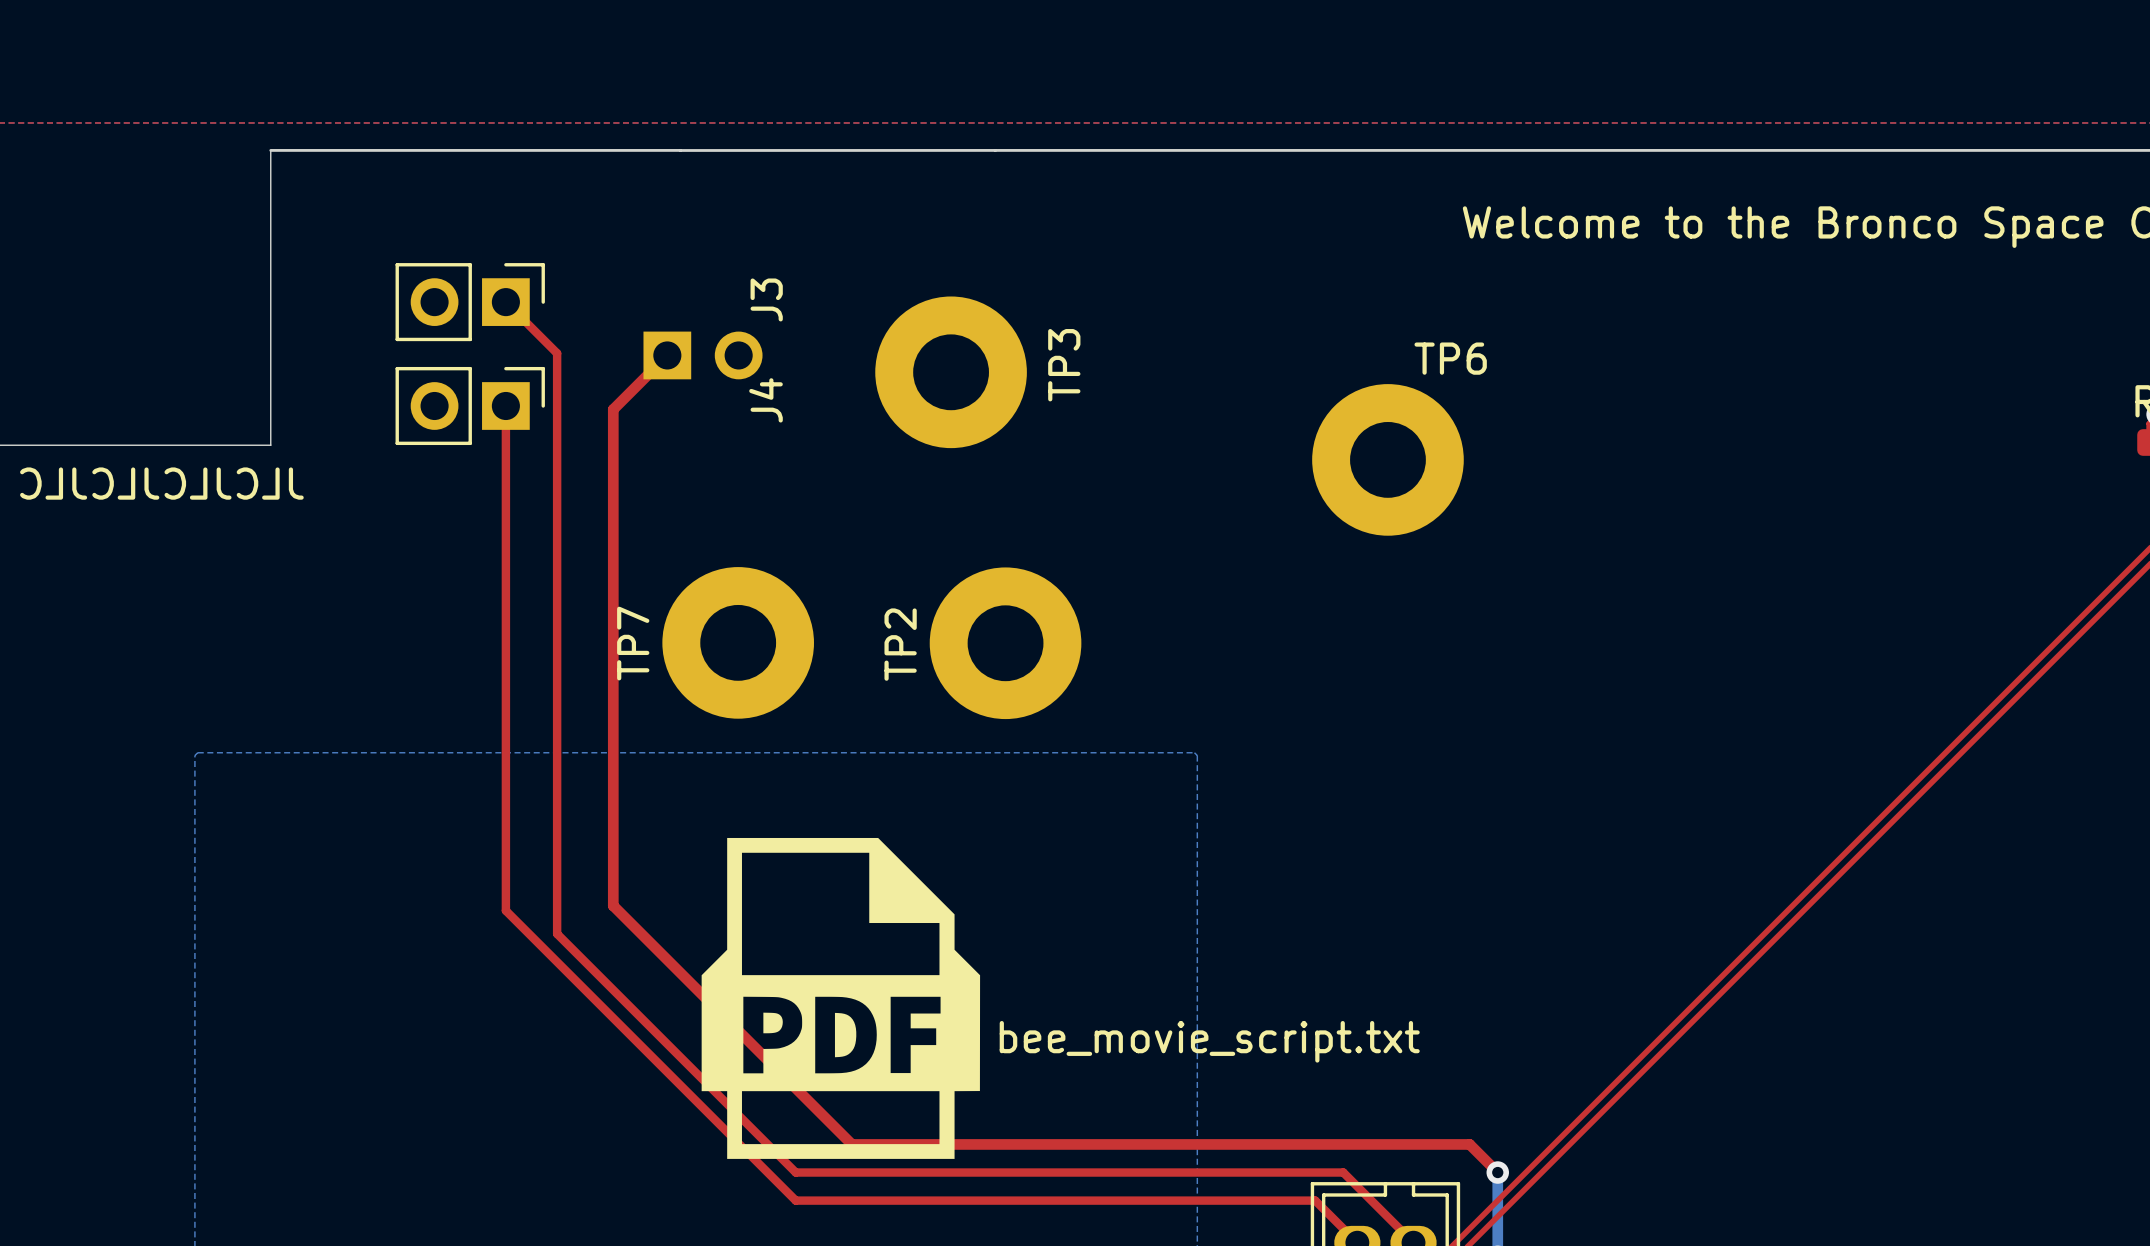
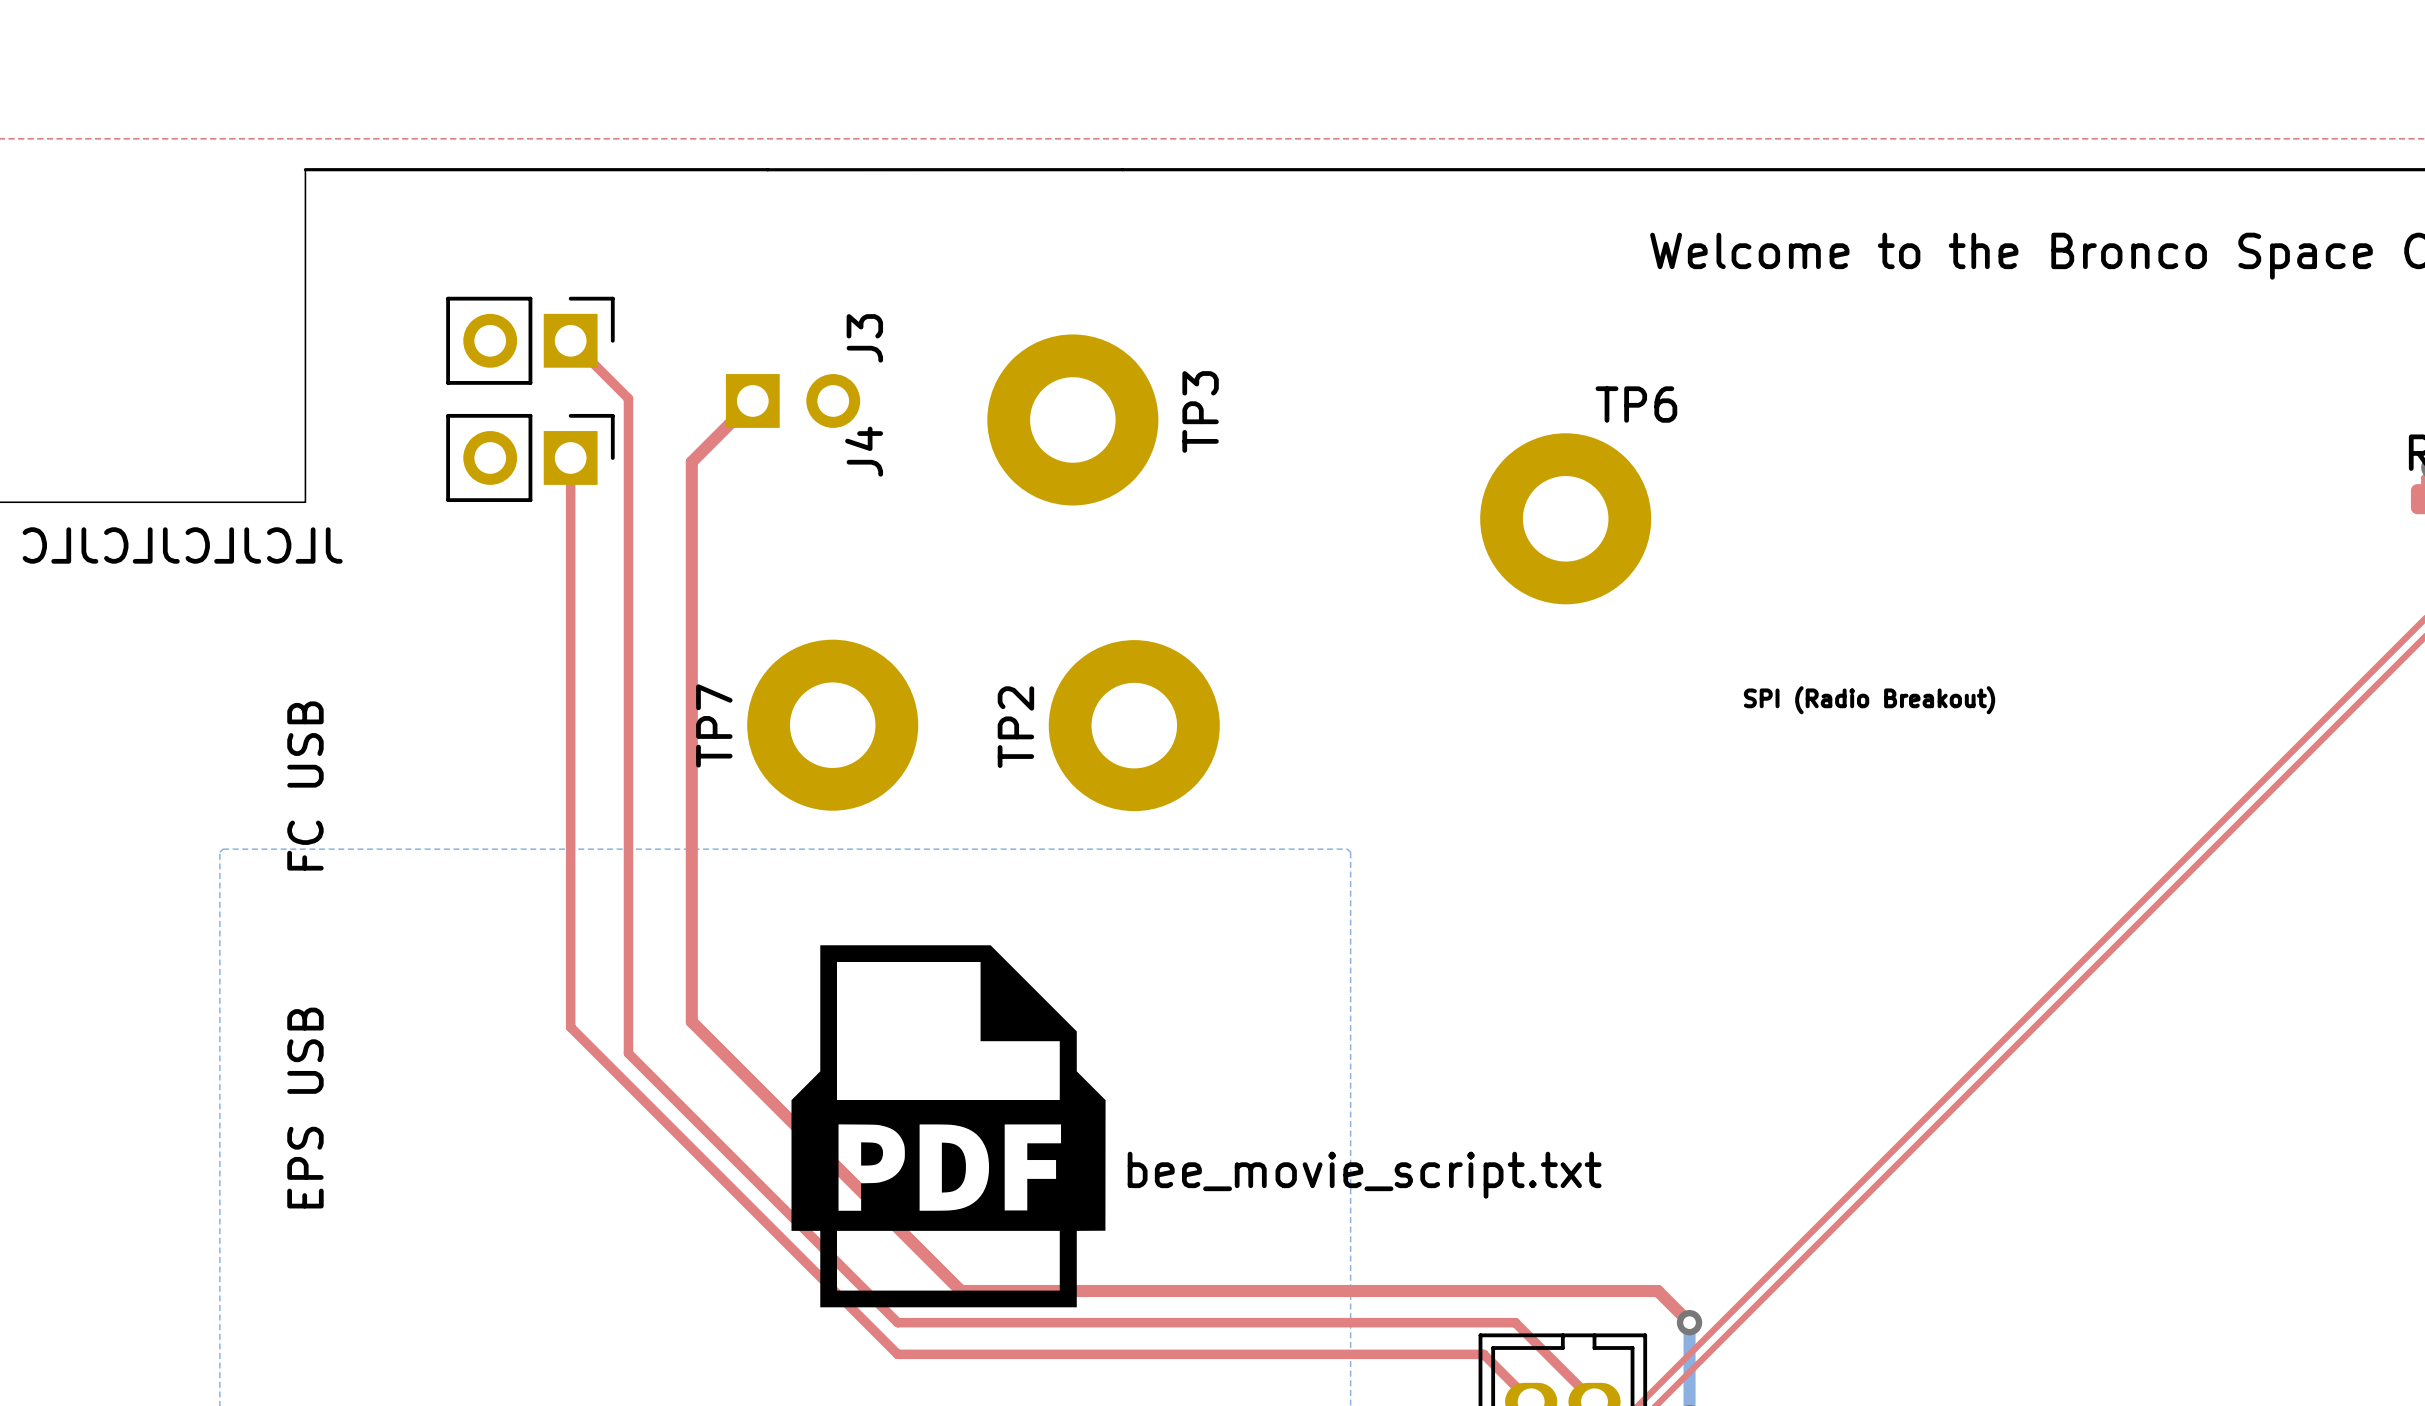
text: none -> SPI (Radio Breakout) (1869, 700)
text: none -> FC USB (305, 785)
text: none -> EPS USB (305, 1108)

